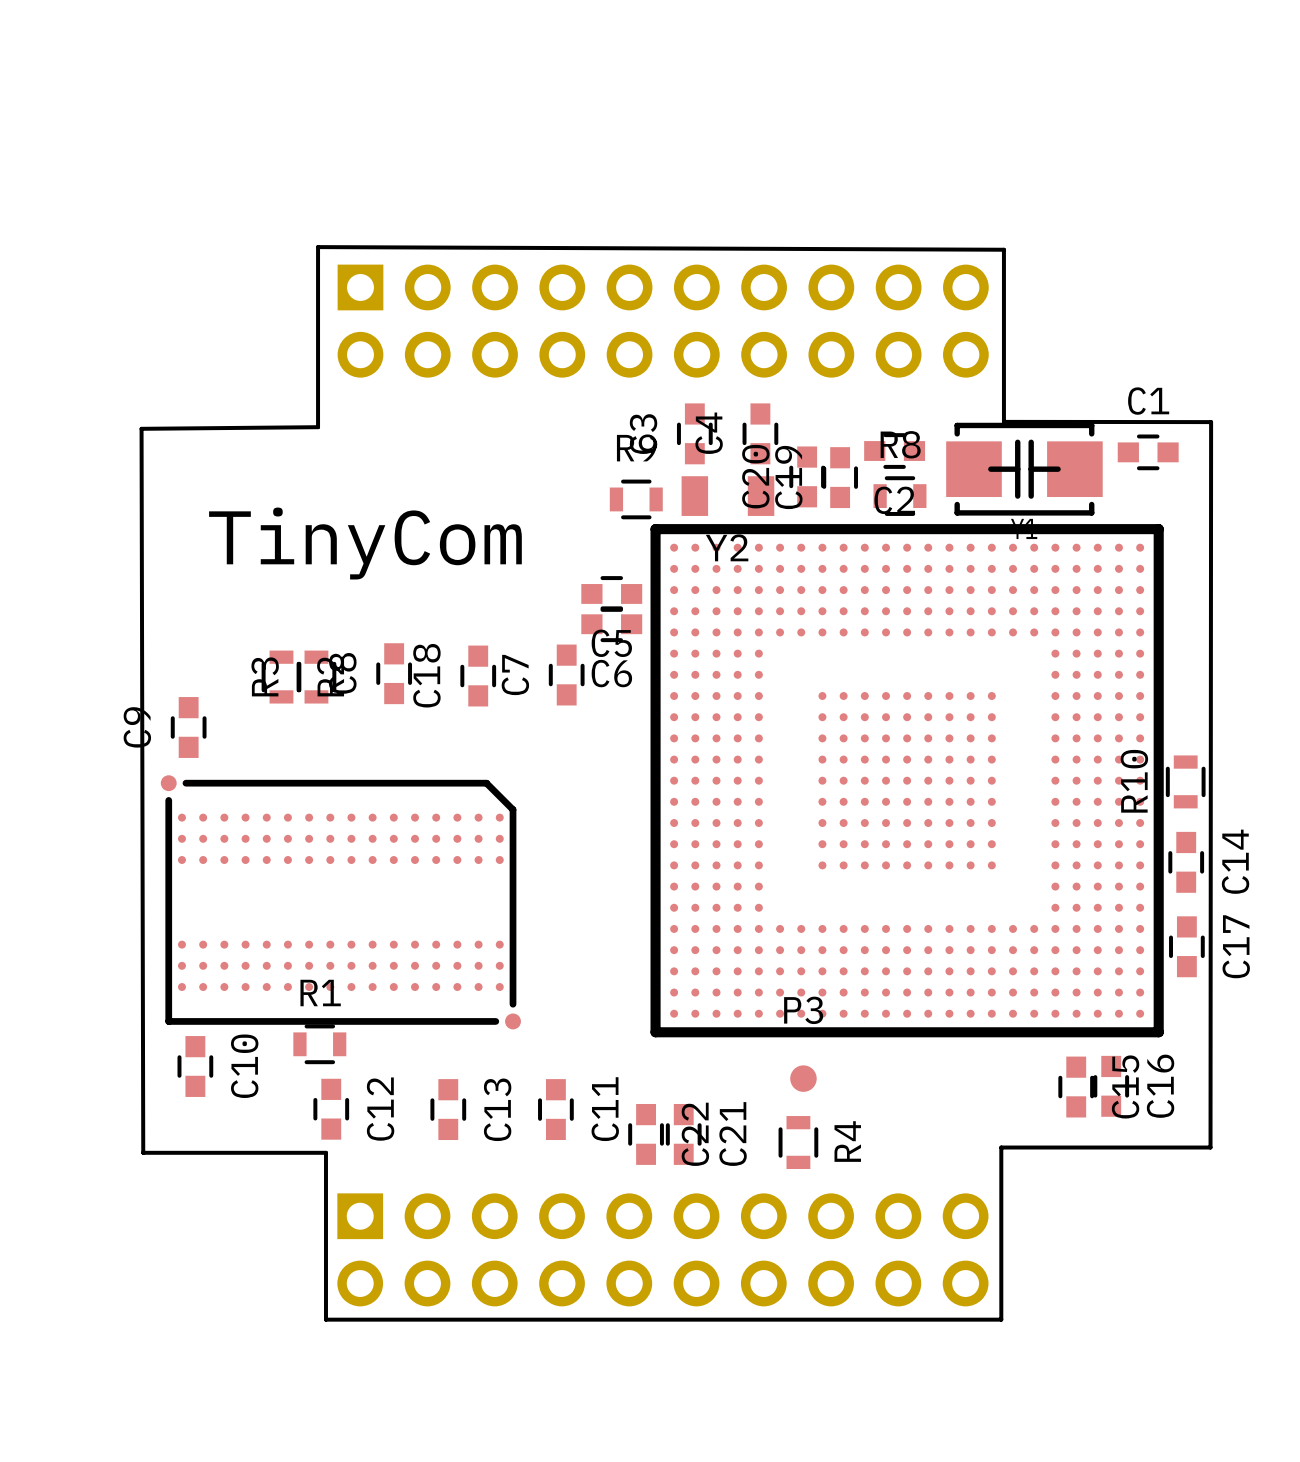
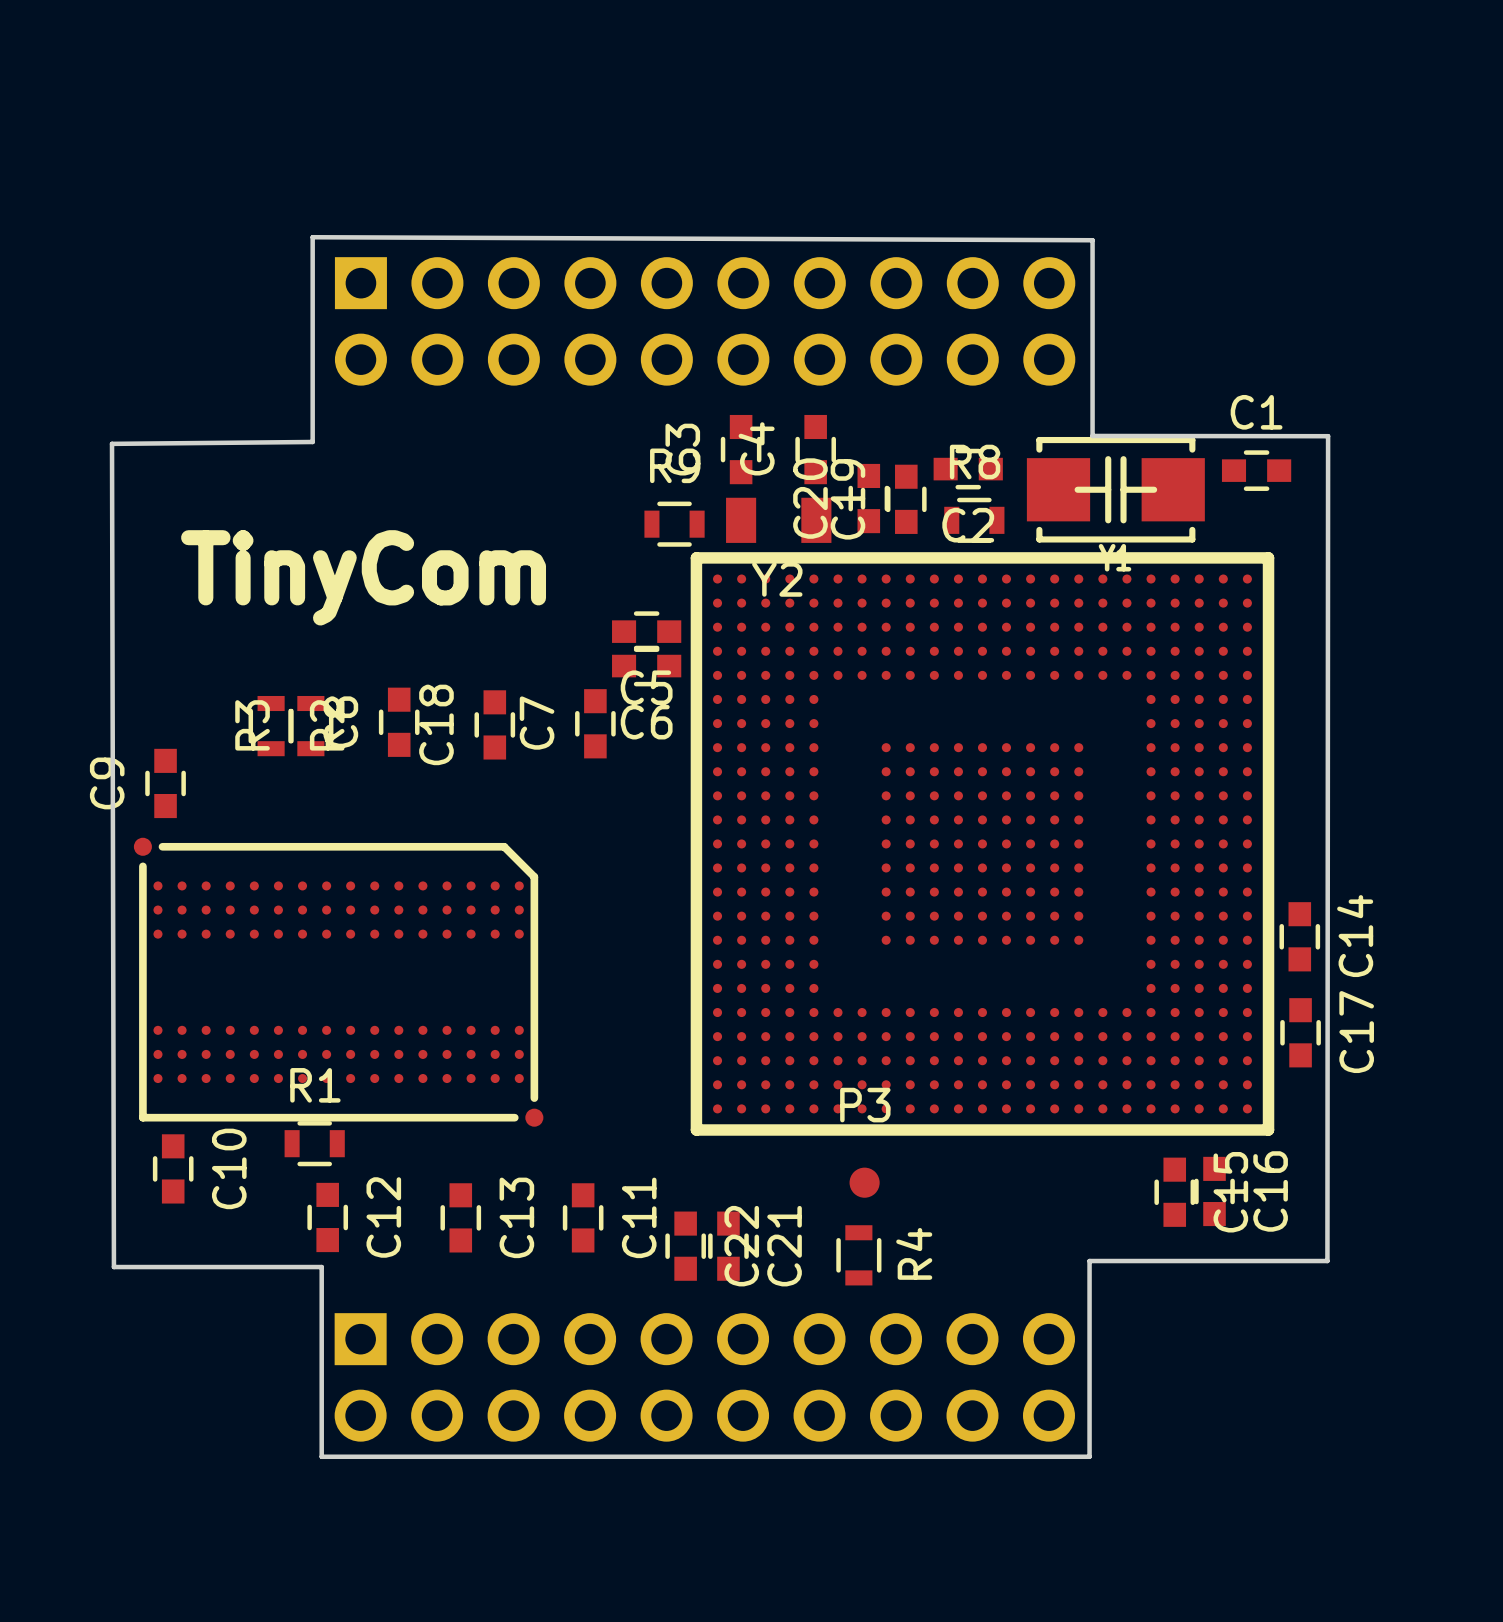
R10: (1185, 781) -> none

